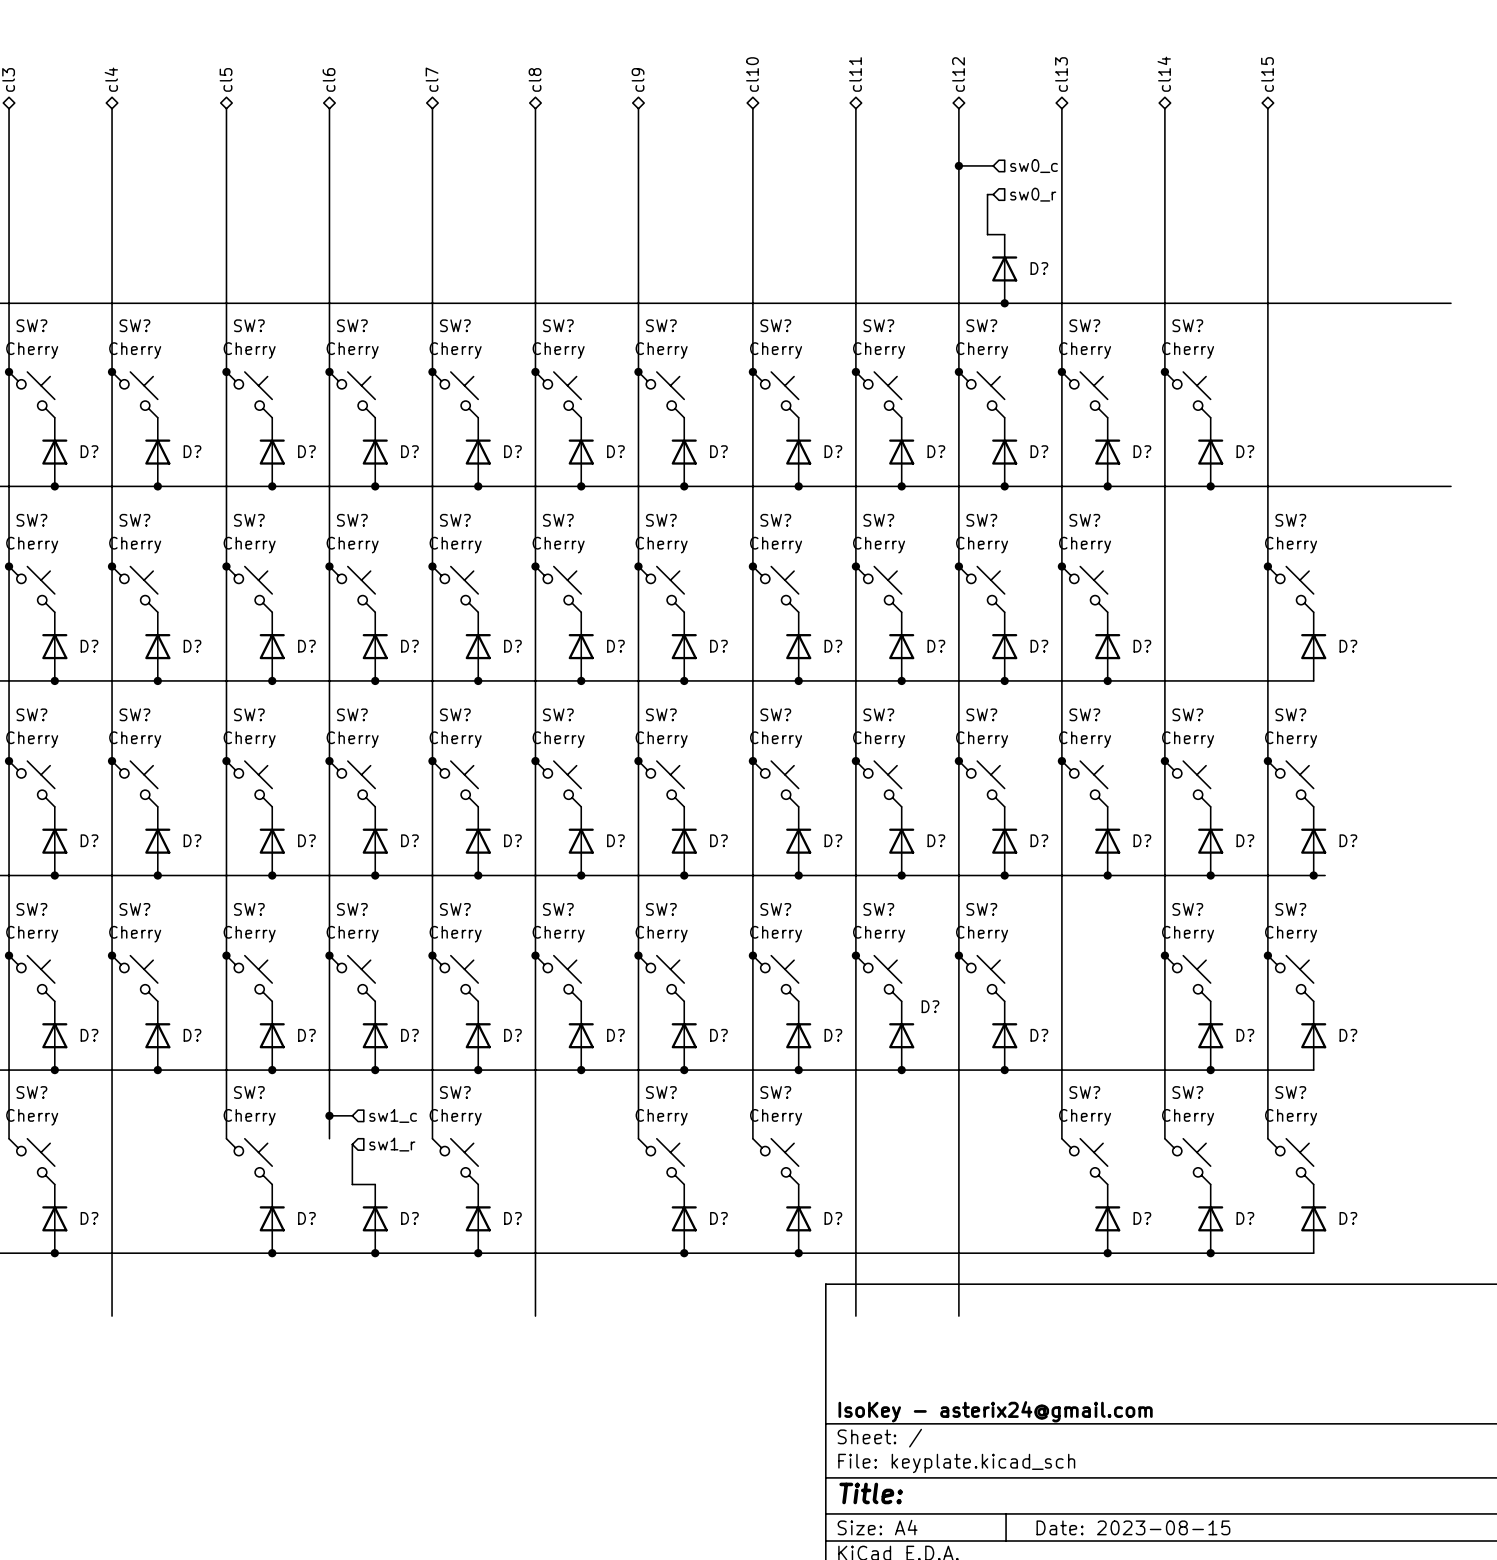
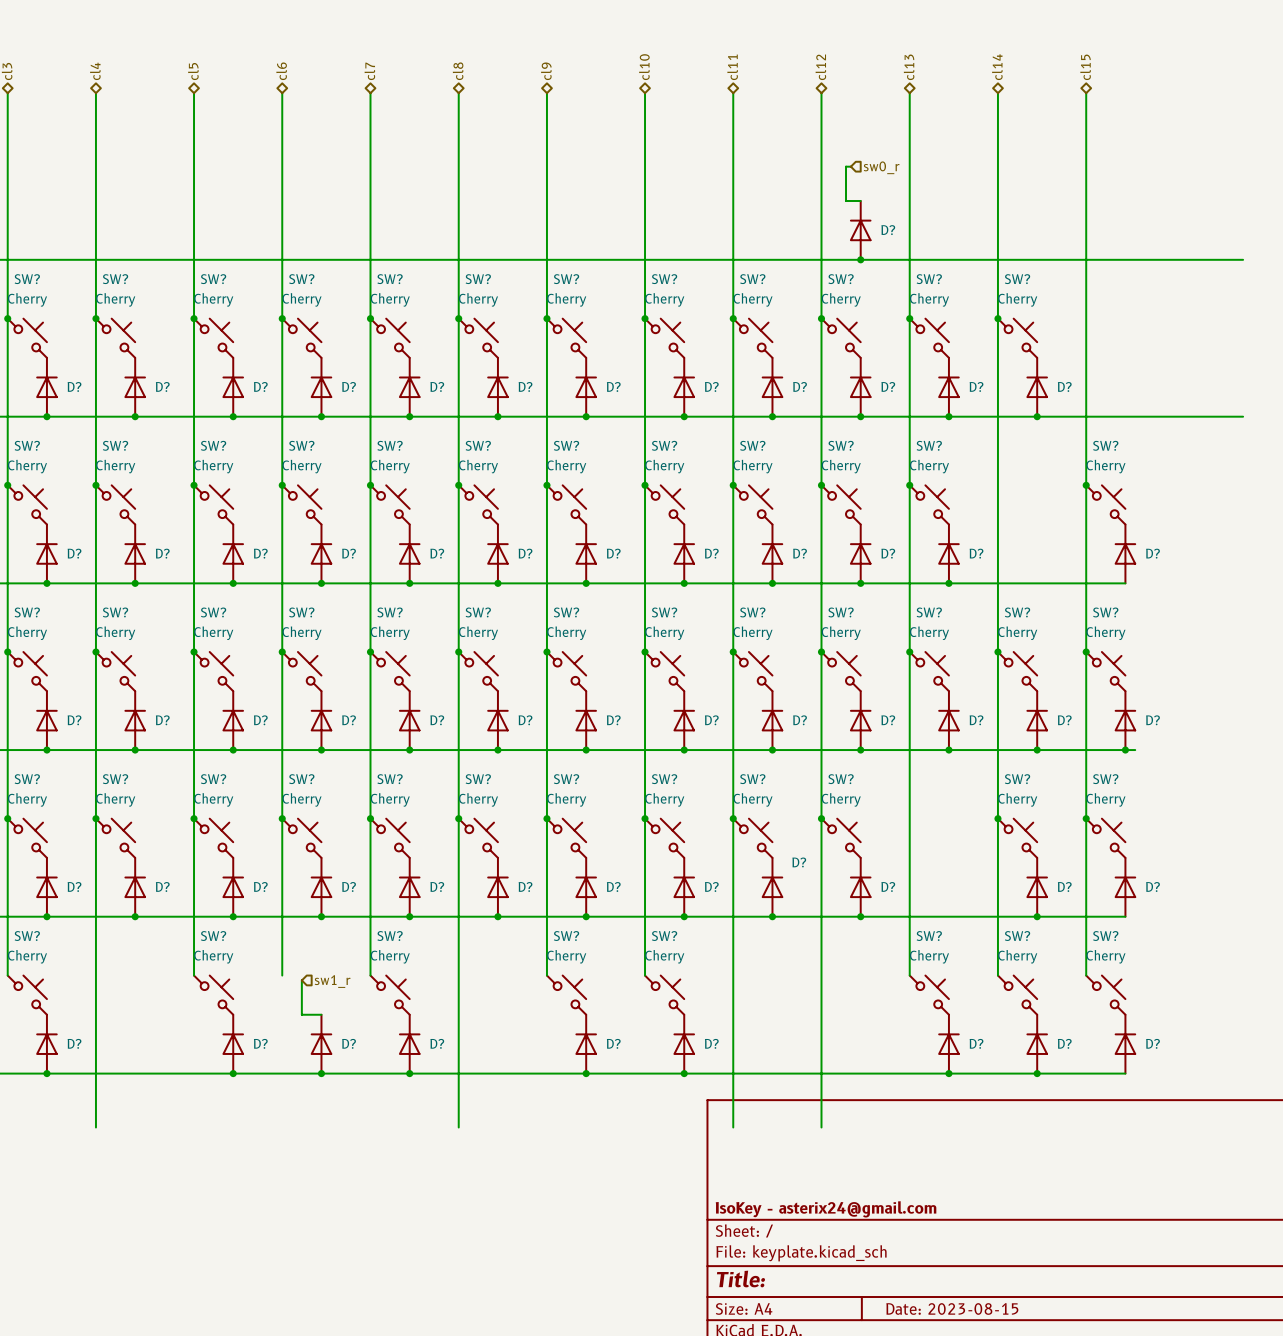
wire: (958, 165) (993, 165) -> none
junction: (958, 165) -> none
hierarchical label: sw0_c (1034, 166) -> none
wire: (329, 1115) (352, 1115) -> none
junction: (329, 1115) -> none
hierarchical label: sw1_c (393, 1115) -> none

